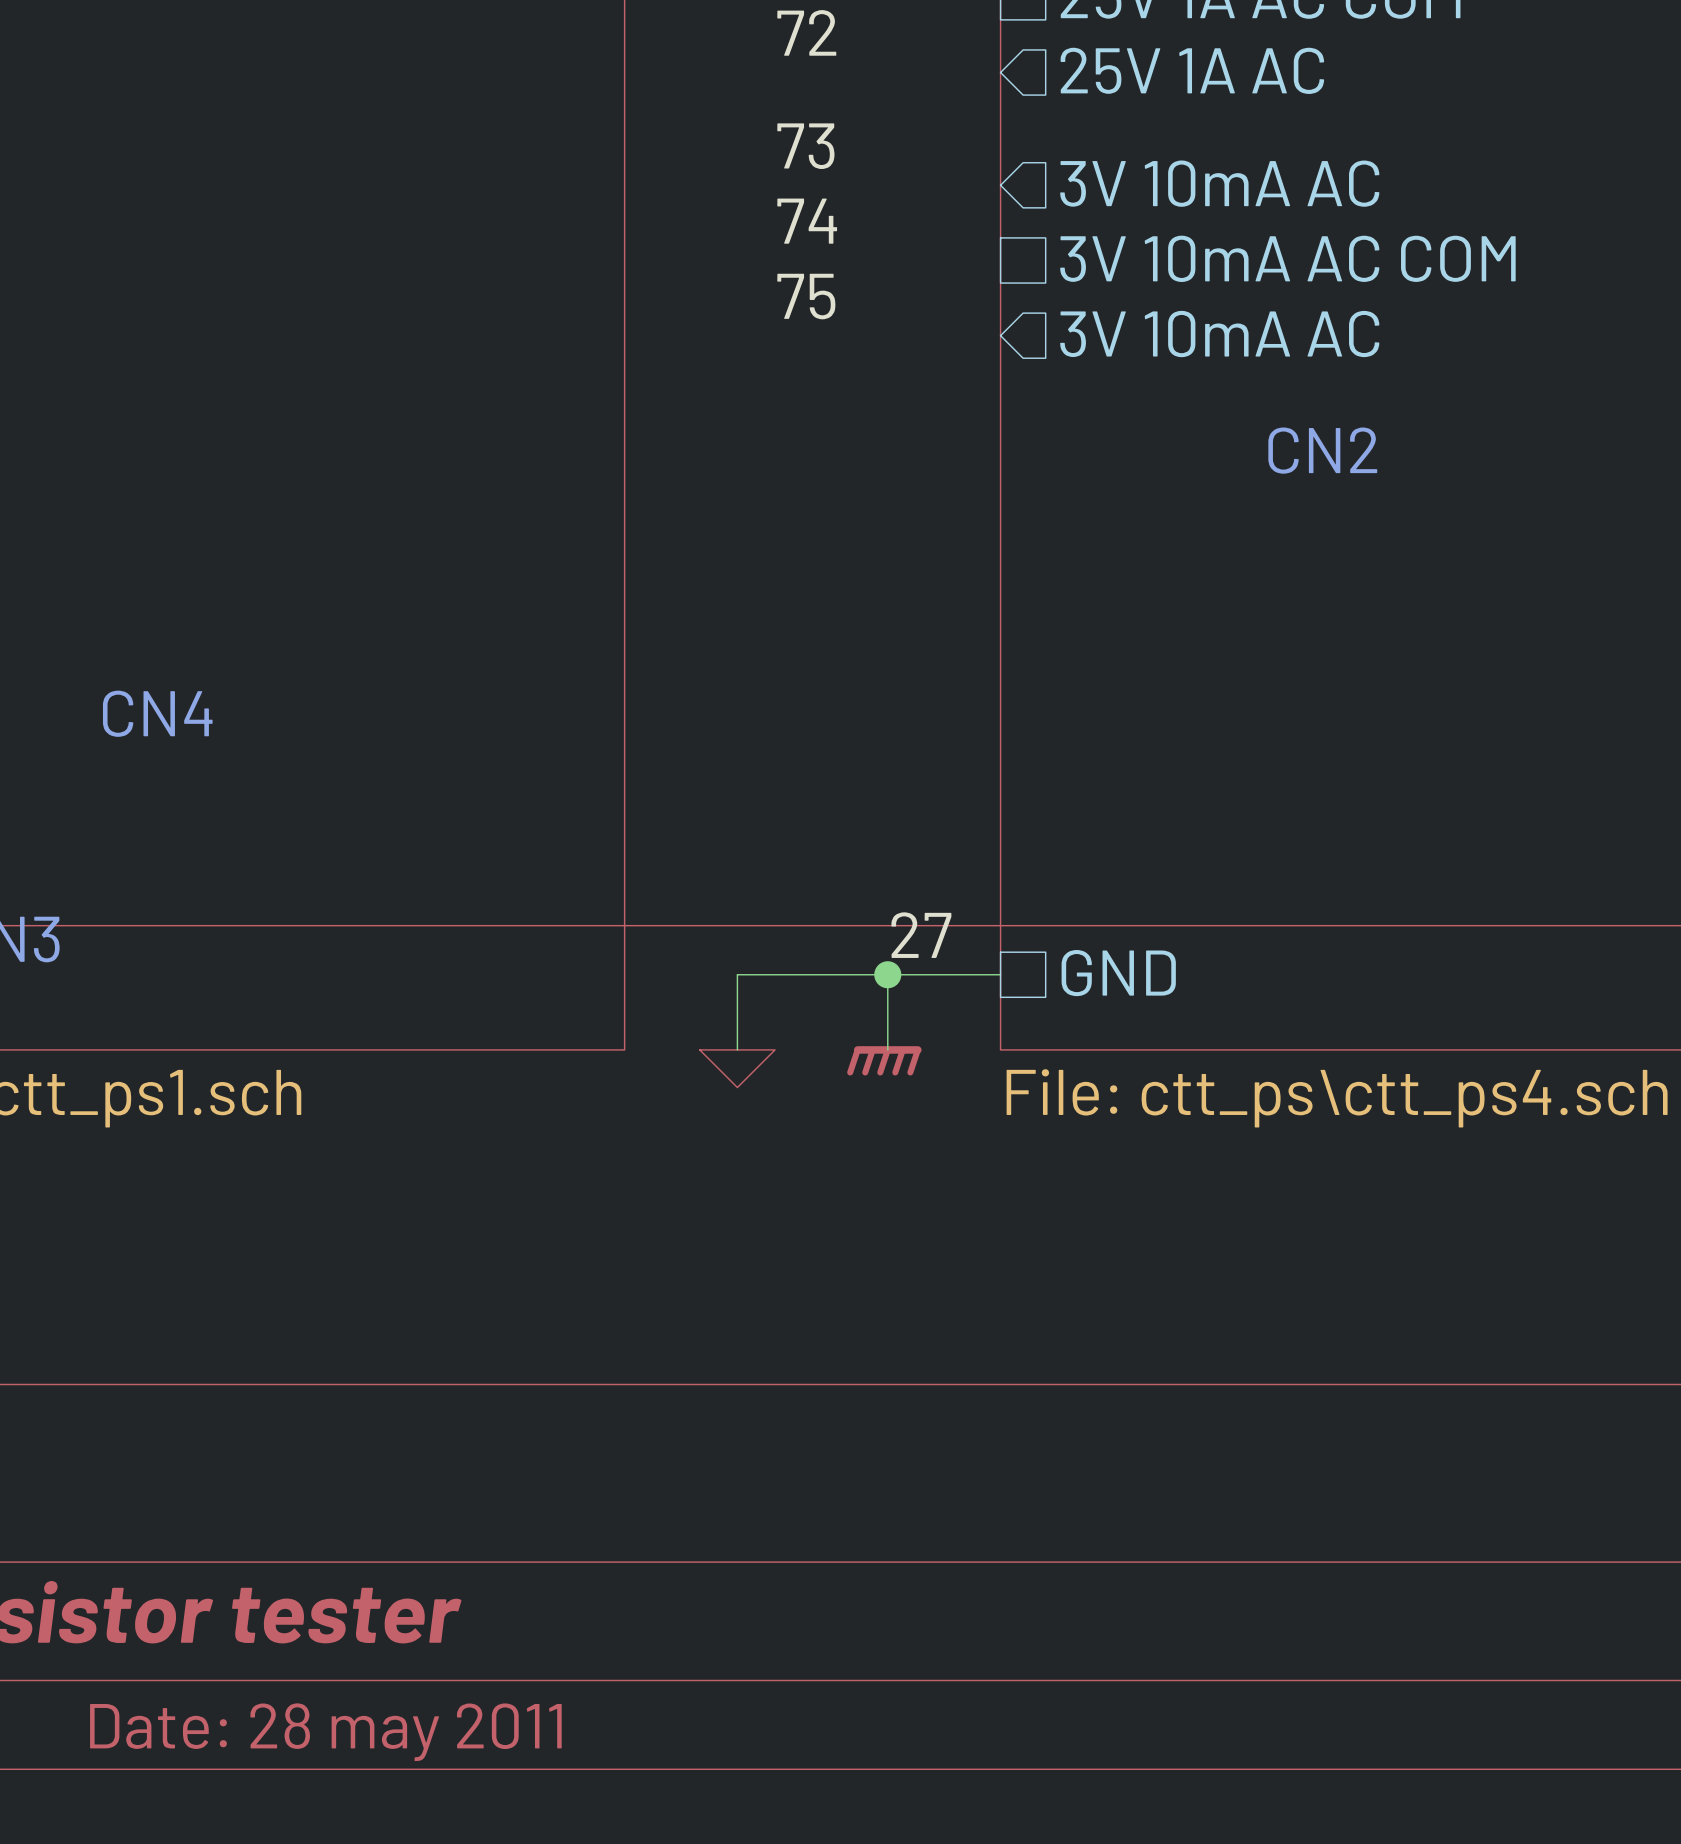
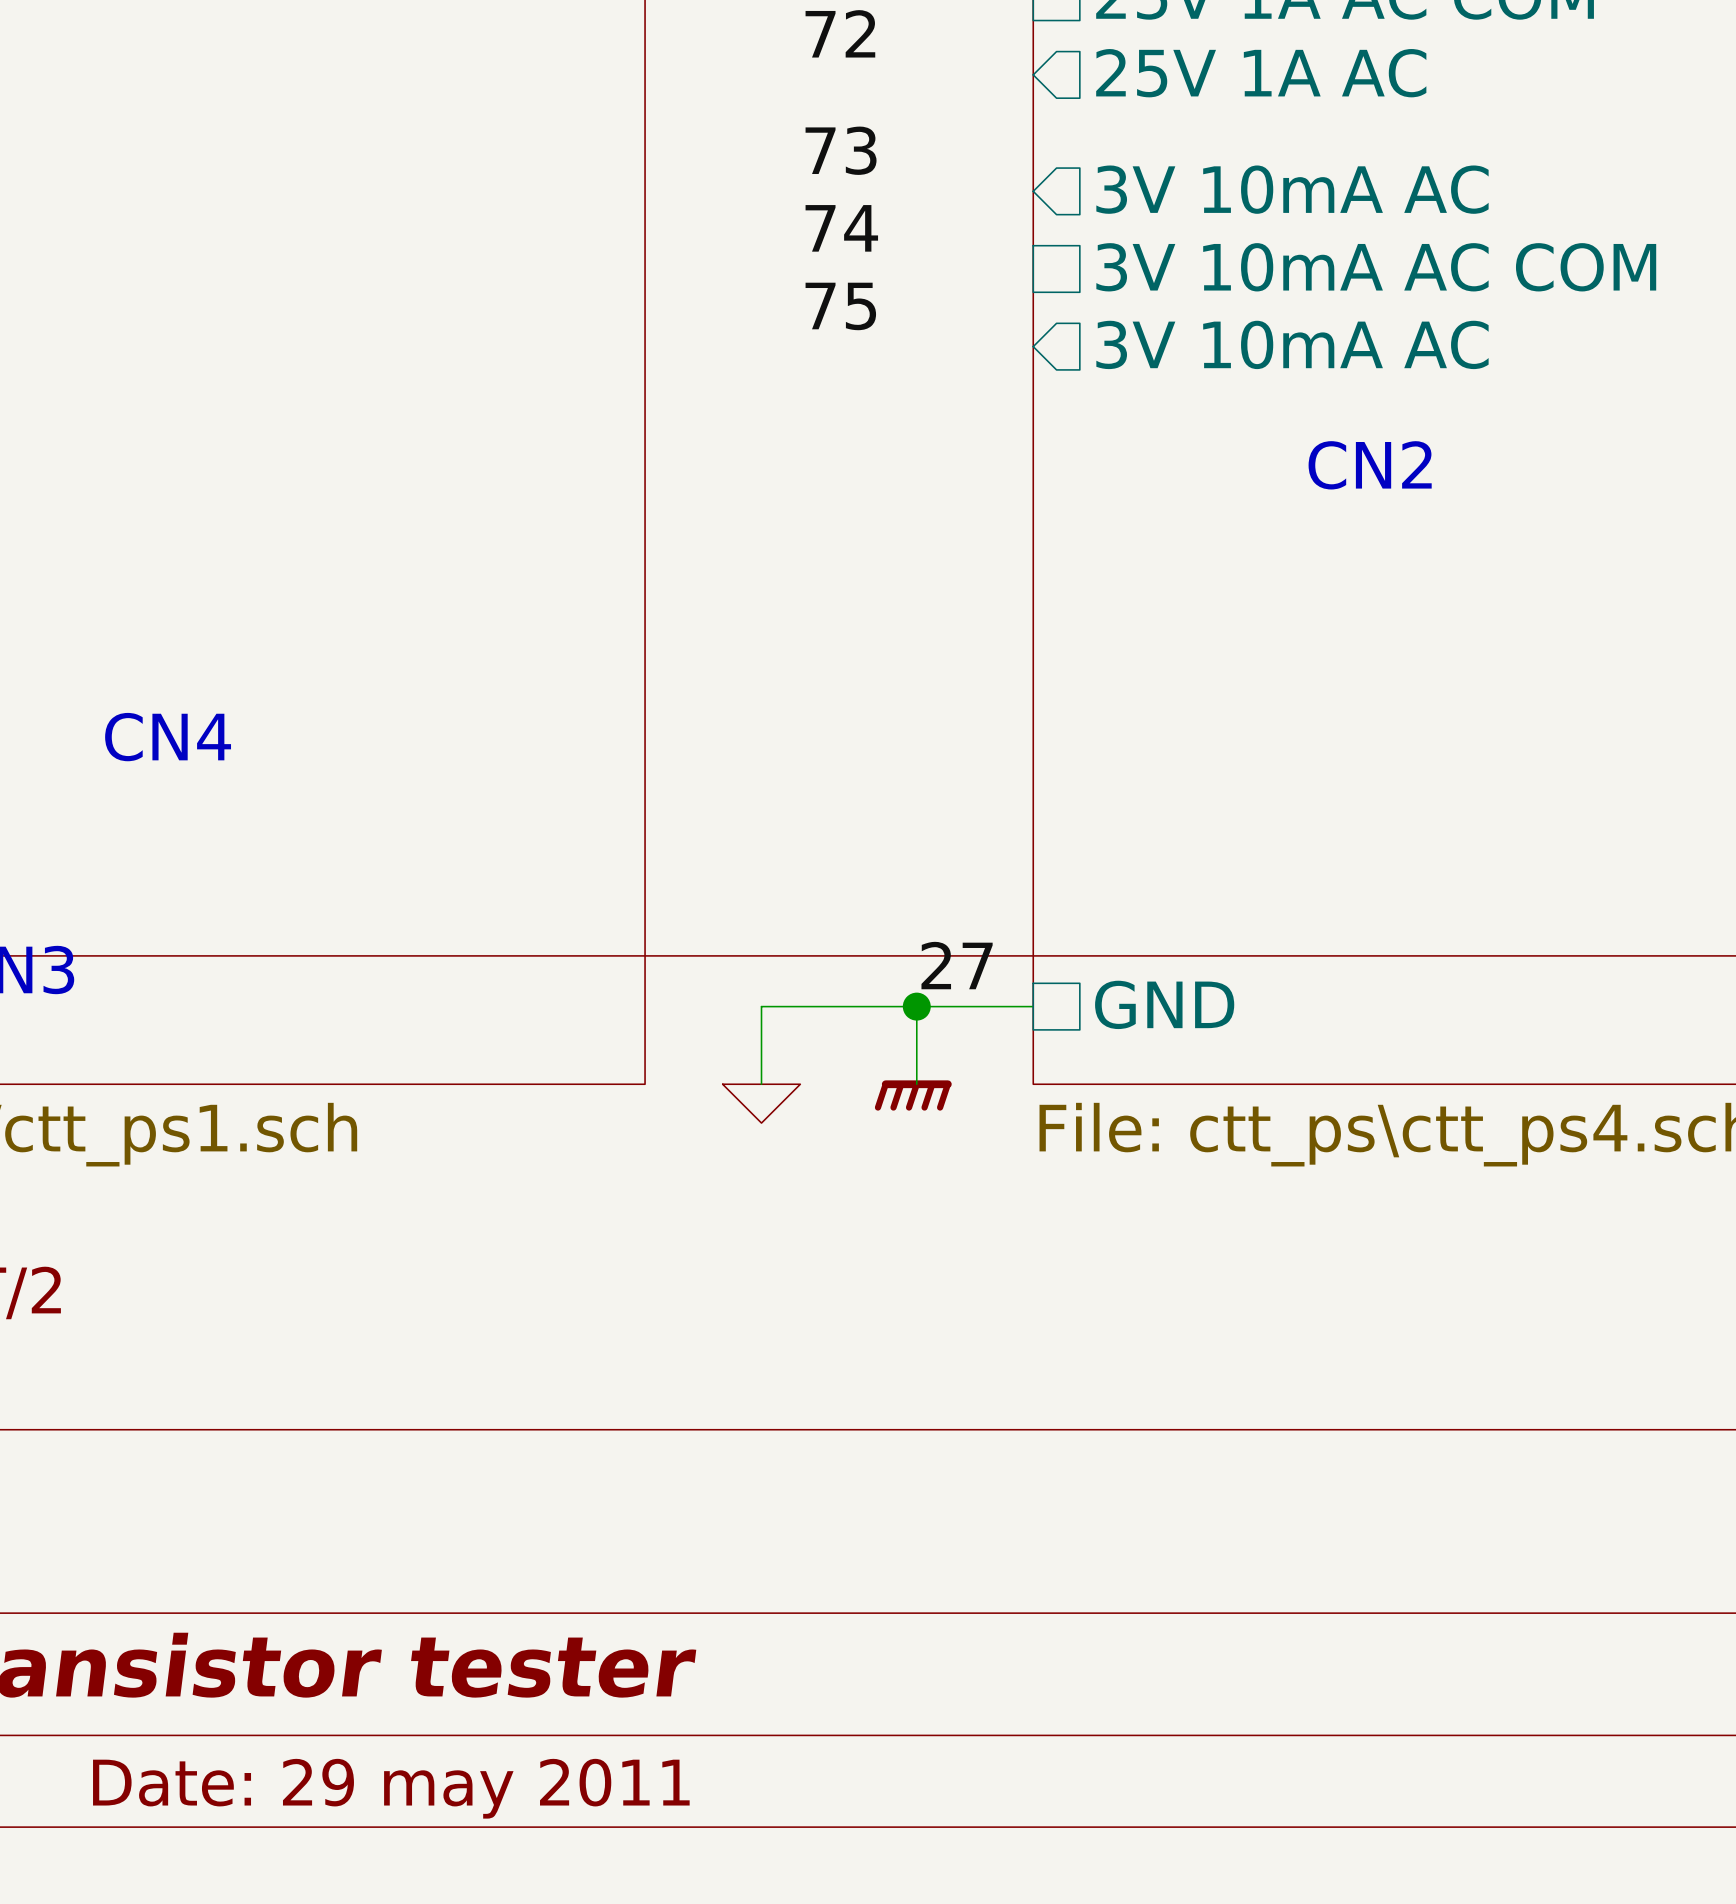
title block: Date: 28 may 2011 (325, 1732) -> Date: 29 may 2011 (391, 1788)

